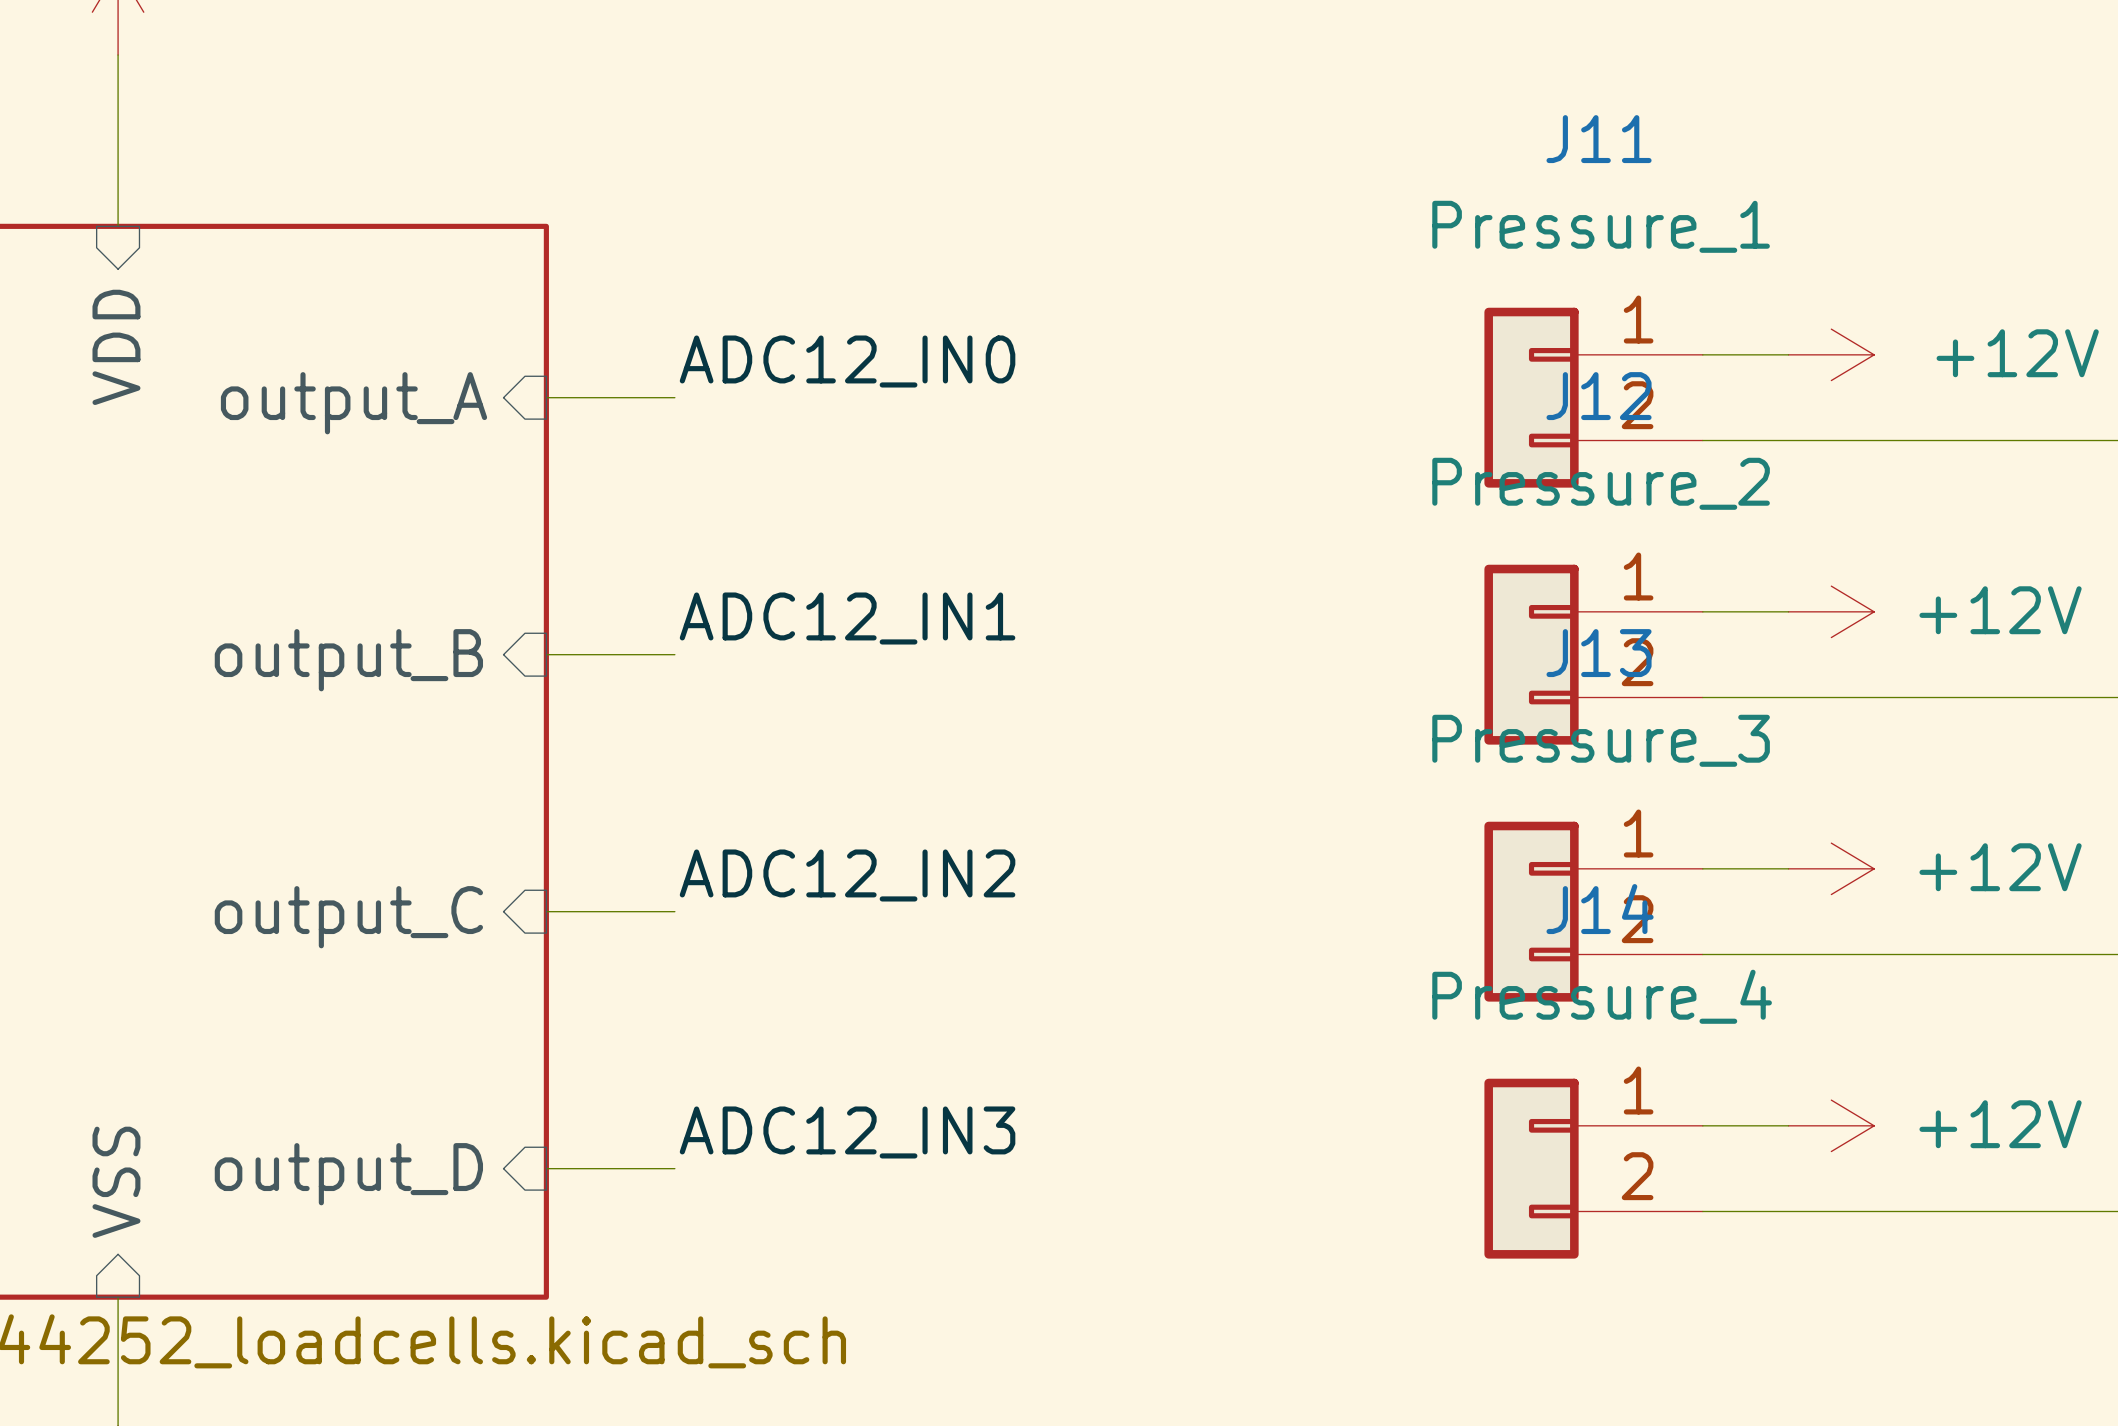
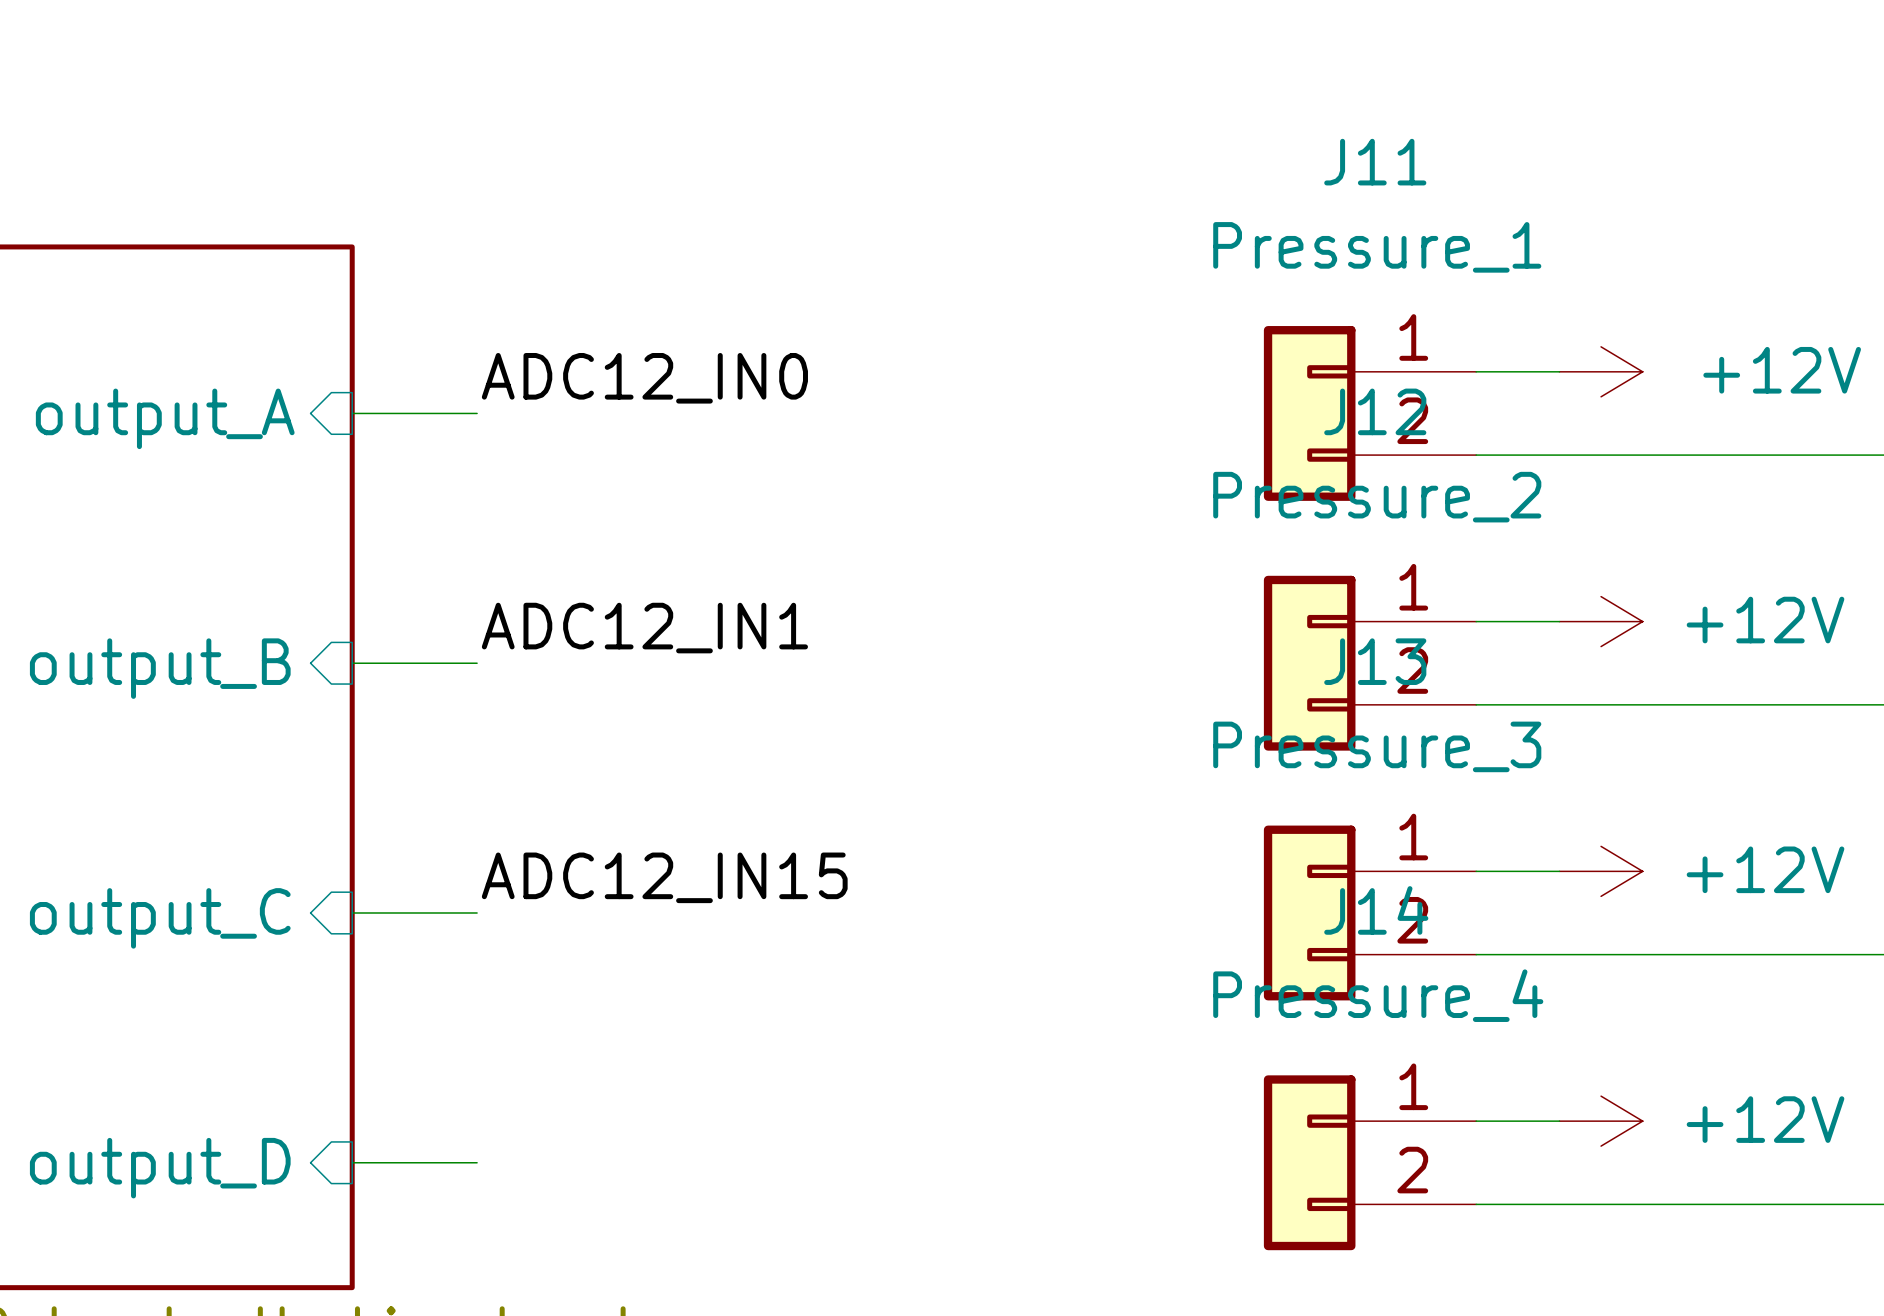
label: ADC12_IN2 (847, 875) -> ADC12_IN15 (664, 877)
label: ADC12_IN3 (847, 1132) -> none

